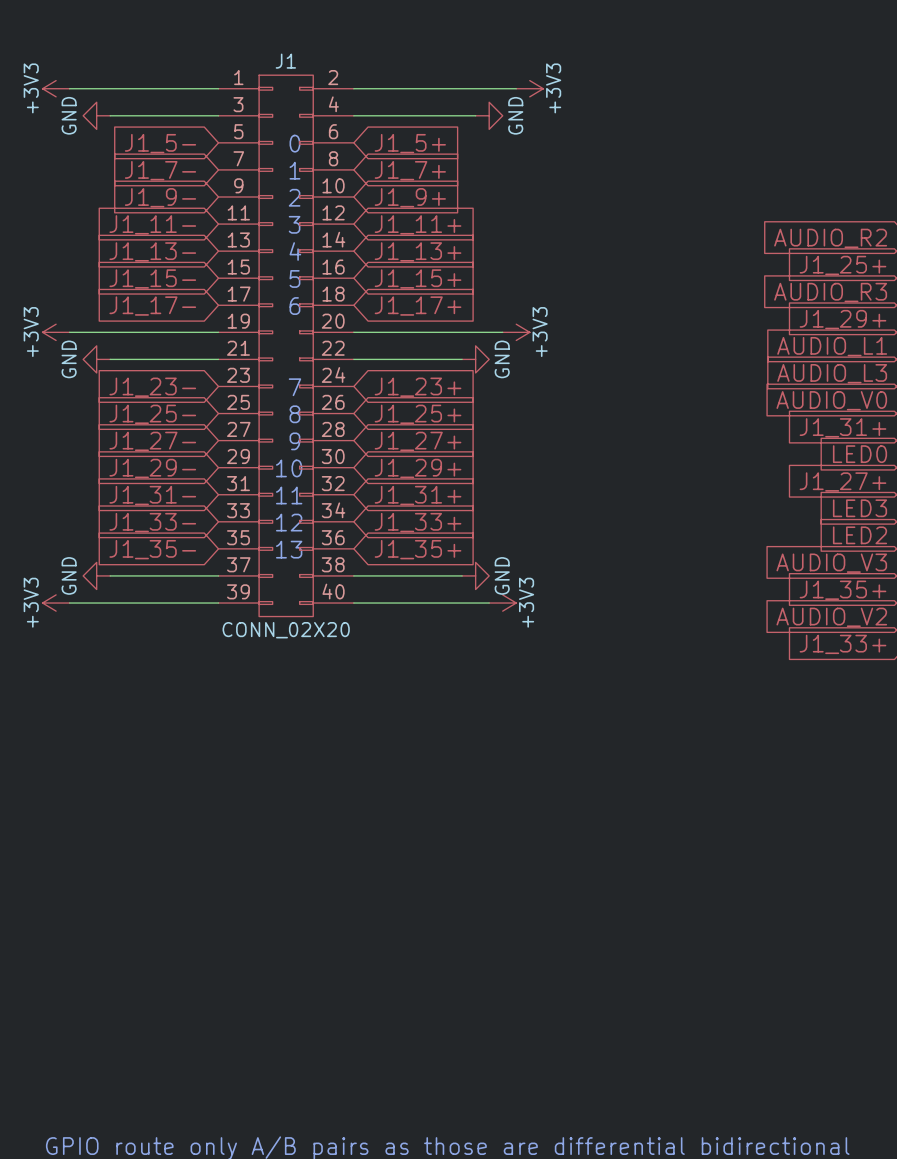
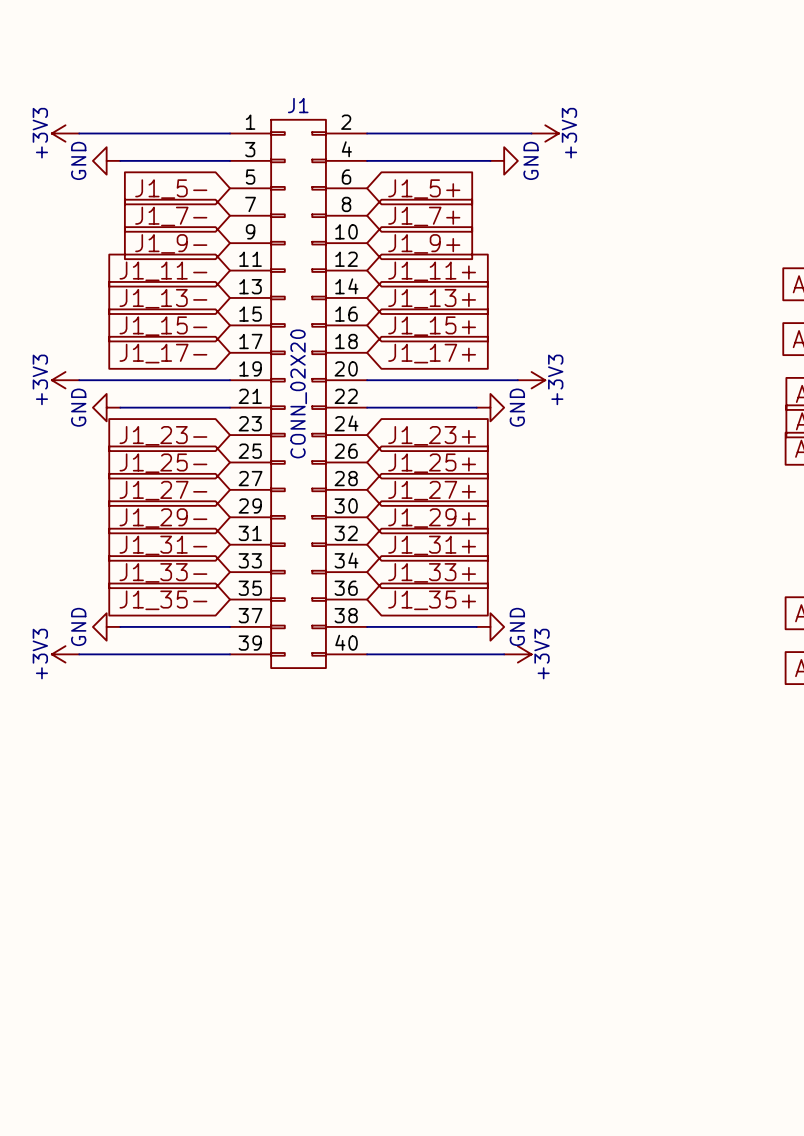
text: 0 (294, 143) -> none
text: 1 (294, 170) -> none
text: 2 (294, 197) -> none
text: 3 (294, 224) -> none
text: 4 (295, 251) -> none
text: 5 (294, 278) -> none
text: 6 (294, 306) -> none
text: 7 (294, 387) -> none
text: 8 (294, 414) -> none
text: 9 (294, 441) -> none
text: 10 (289, 468) -> none
text: 11 (289, 495) -> none
text: 12 (289, 522) -> none
text: 13 (289, 549) -> none
J1 value rotation: 0° (286, 630) -> 90° counterclockwise (298, 393)
J1 value position: CONN_02X20 (286, 630) -> CONN_02X20 (298, 393)

